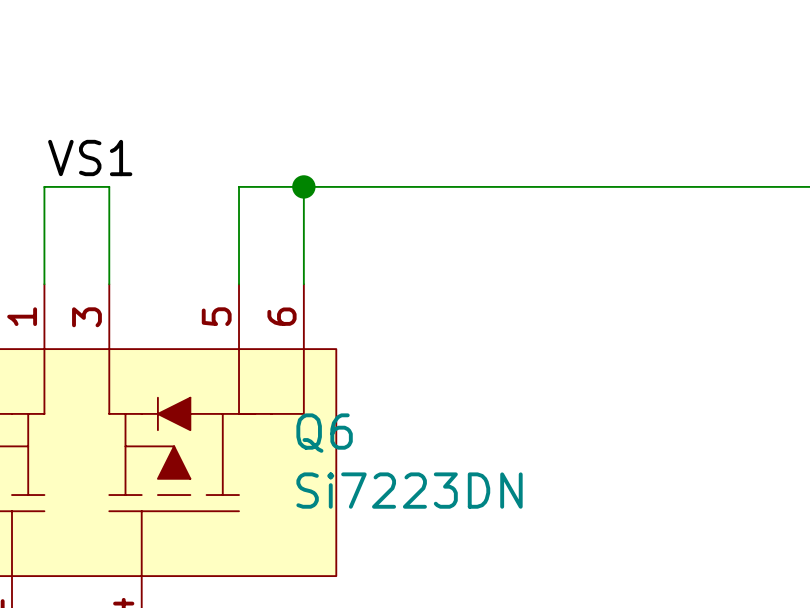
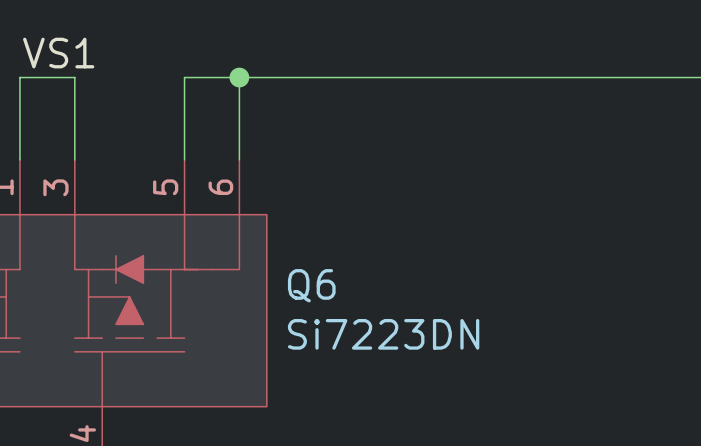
Q6 name position: Q6 (324, 433) -> Q6 (311, 285)
Q6 value position: Si7223DN (409, 490) -> Si7223DN (383, 334)

